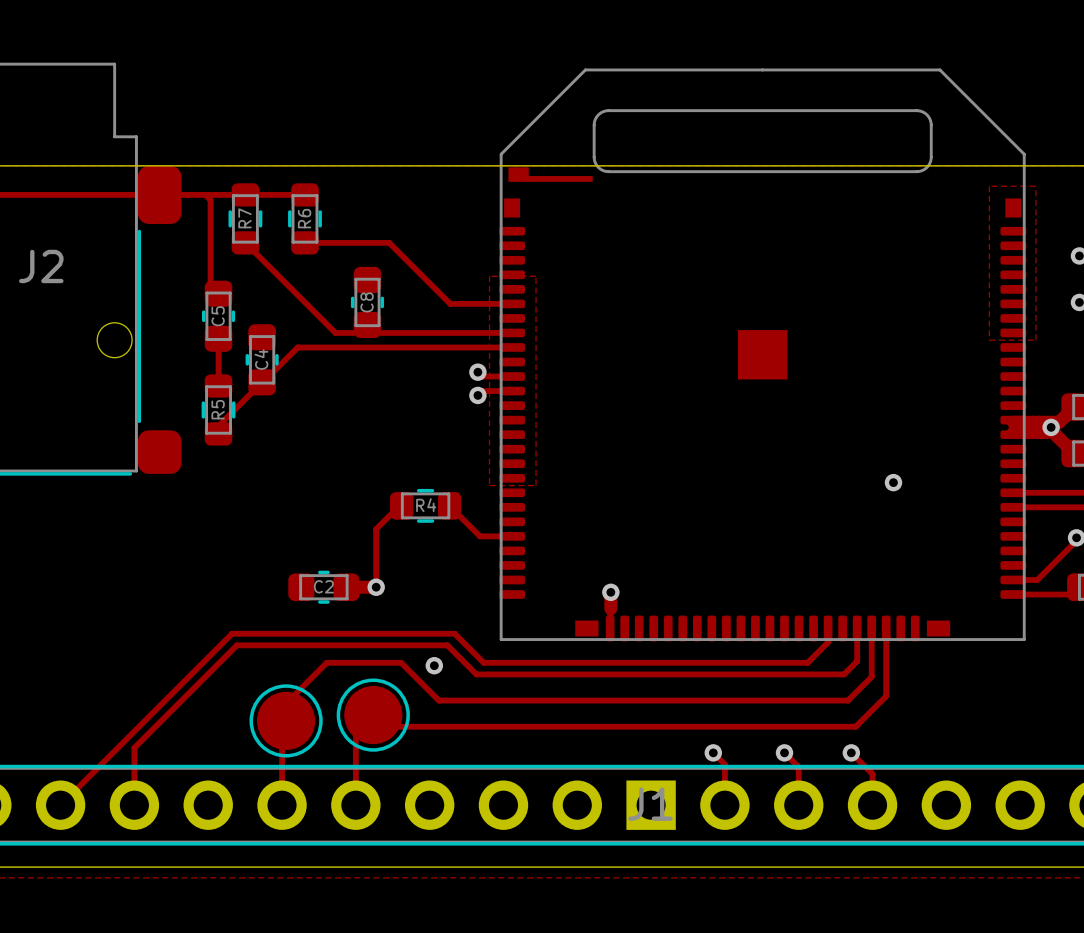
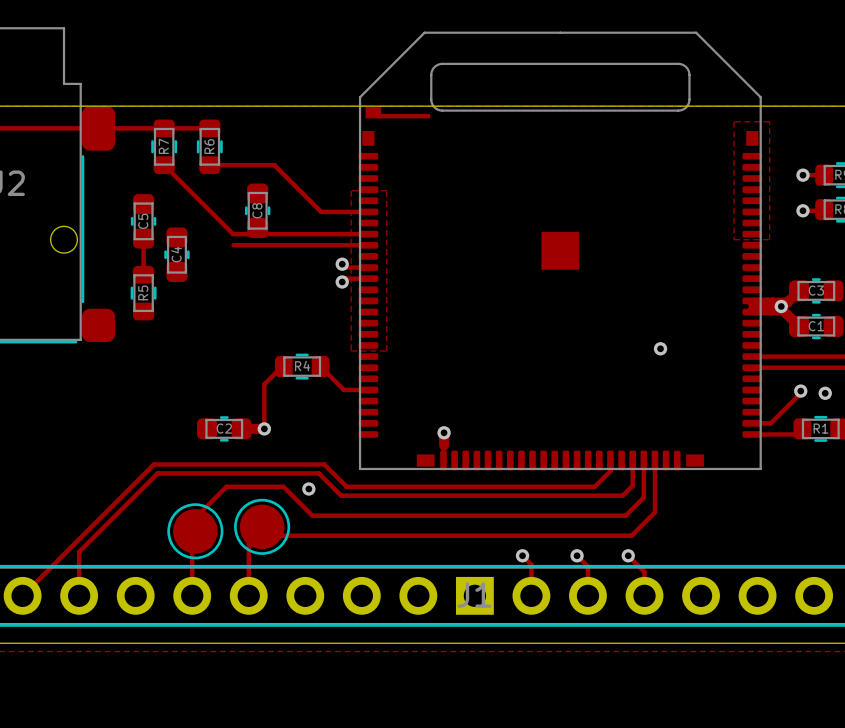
track: (205, 194) (210, 200) (210, 285) (218, 293) -> none
track: (335, 347) (297, 347) (218, 425) (218, 433) -> none

